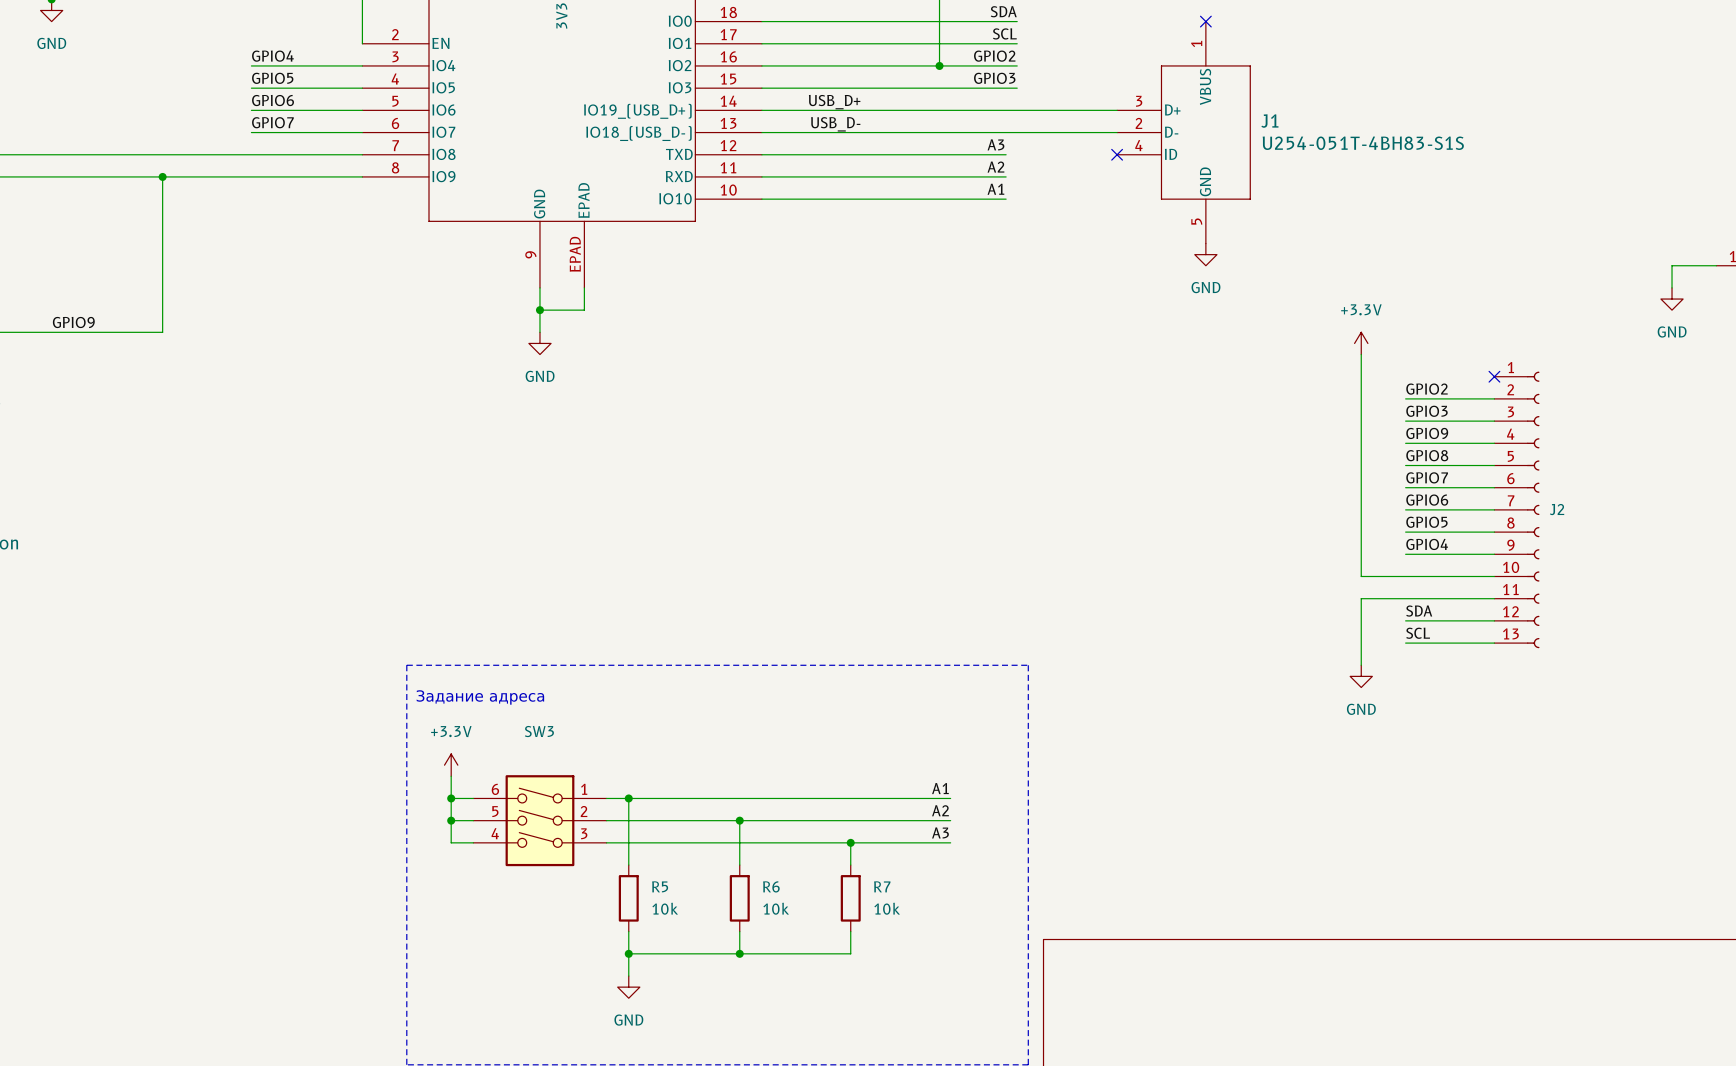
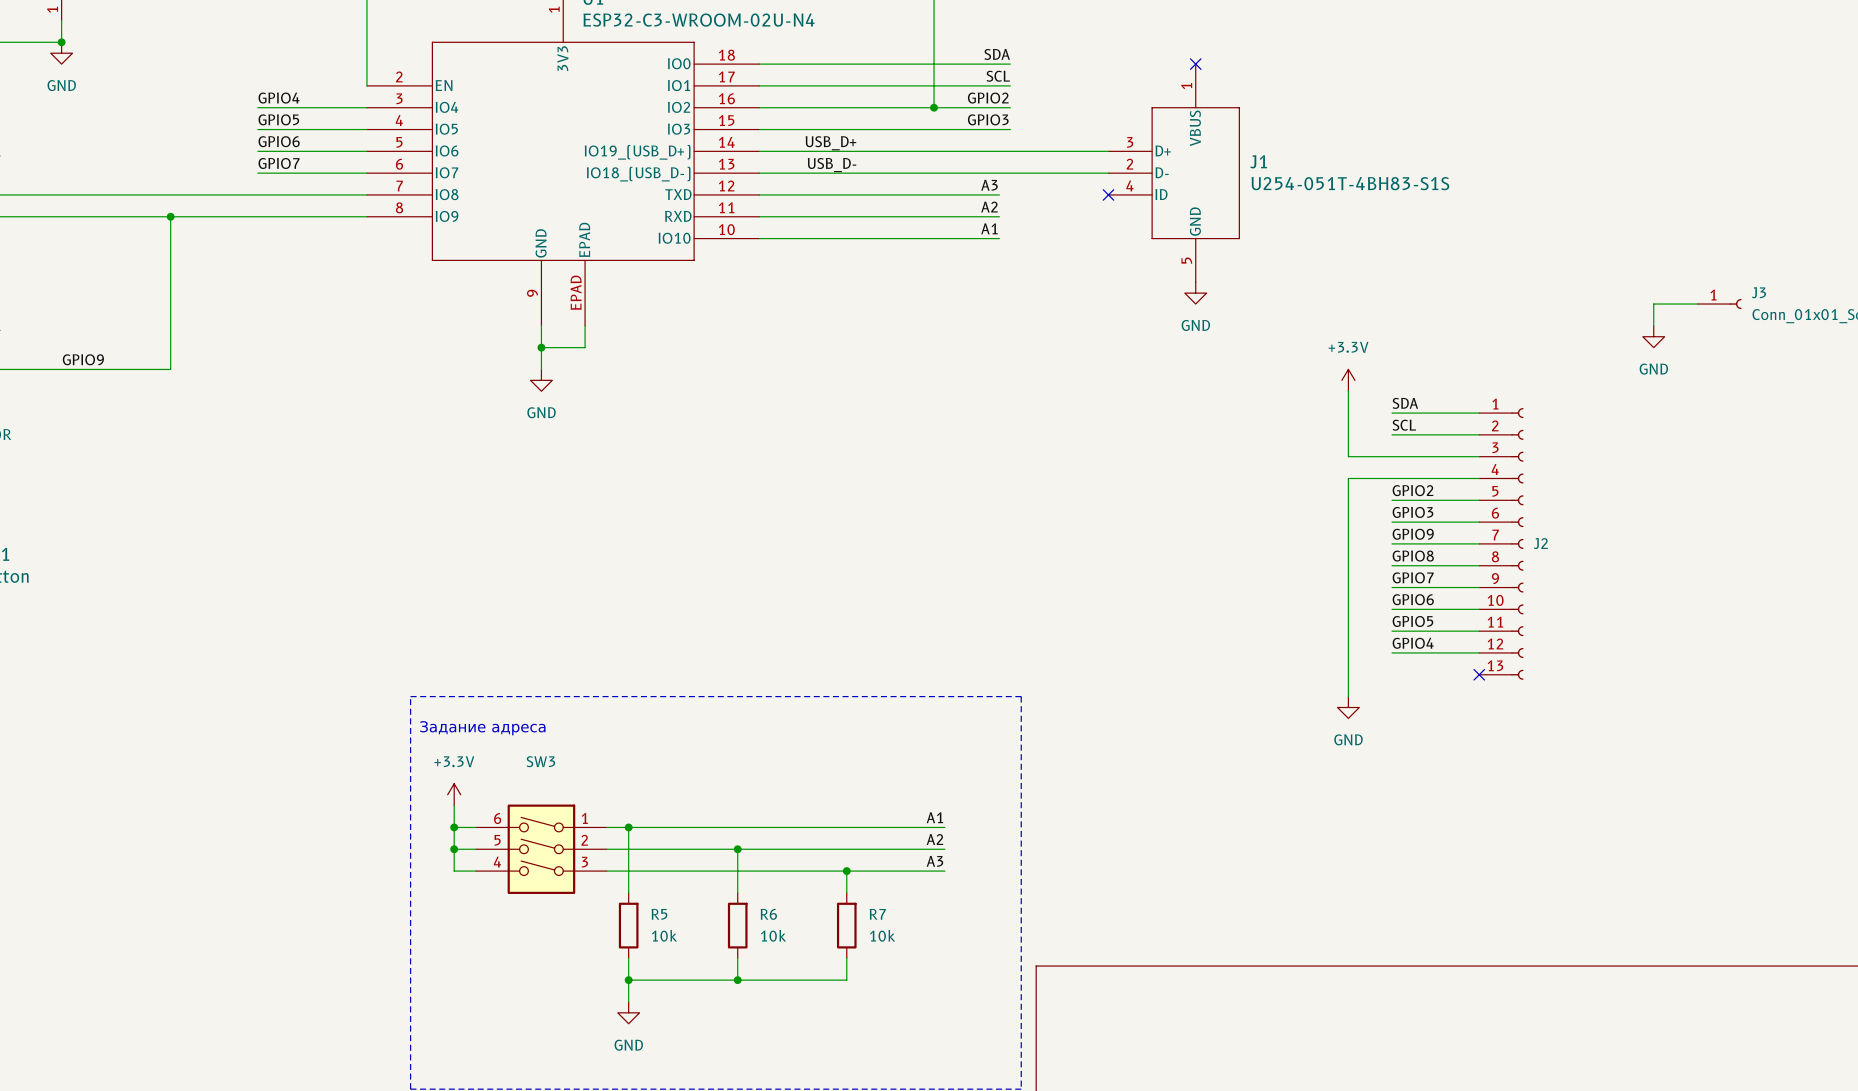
label: none -> SDA (1405, 403)
wire: none -> (1392, 413) (1479, 413)
no-connect mark: (1494, 376) -> none
label: GPIO2 (1426, 389) -> SCL (1404, 425)
label: GPIO3 (1426, 411) -> none
wire: (1361, 421) (1361, 443) -> (1348, 456) (1392, 456)
label: GPIO9 (1427, 433) -> none
label: GPIO8 (1427, 455) -> GPIO2 (1412, 490)
label: GPIO7 (1427, 477) -> GPIO3 (1412, 512)
label: GPIO6 (1427, 500) -> GPIO9 (1413, 534)
label: GPIO5 (1426, 522) -> GPIO8 (1413, 556)
label: GPIO4 (1427, 544) -> GPIO7 (1413, 577)
label: none -> GPIO6 (1413, 599)
wire: (1361, 576) (1405, 576) -> (1348, 609) (1348, 631)
label: none -> GPIO5 (1412, 621)
wire: (1361, 598) (1405, 598) -> (1348, 478) (1392, 478)
label: SDA (1419, 611) -> GPIO4 (1413, 643)
label: SCL (1418, 633) -> none
wire: (1405, 643) (1494, 643) -> none
no-connect mark: none -> (1479, 674)

